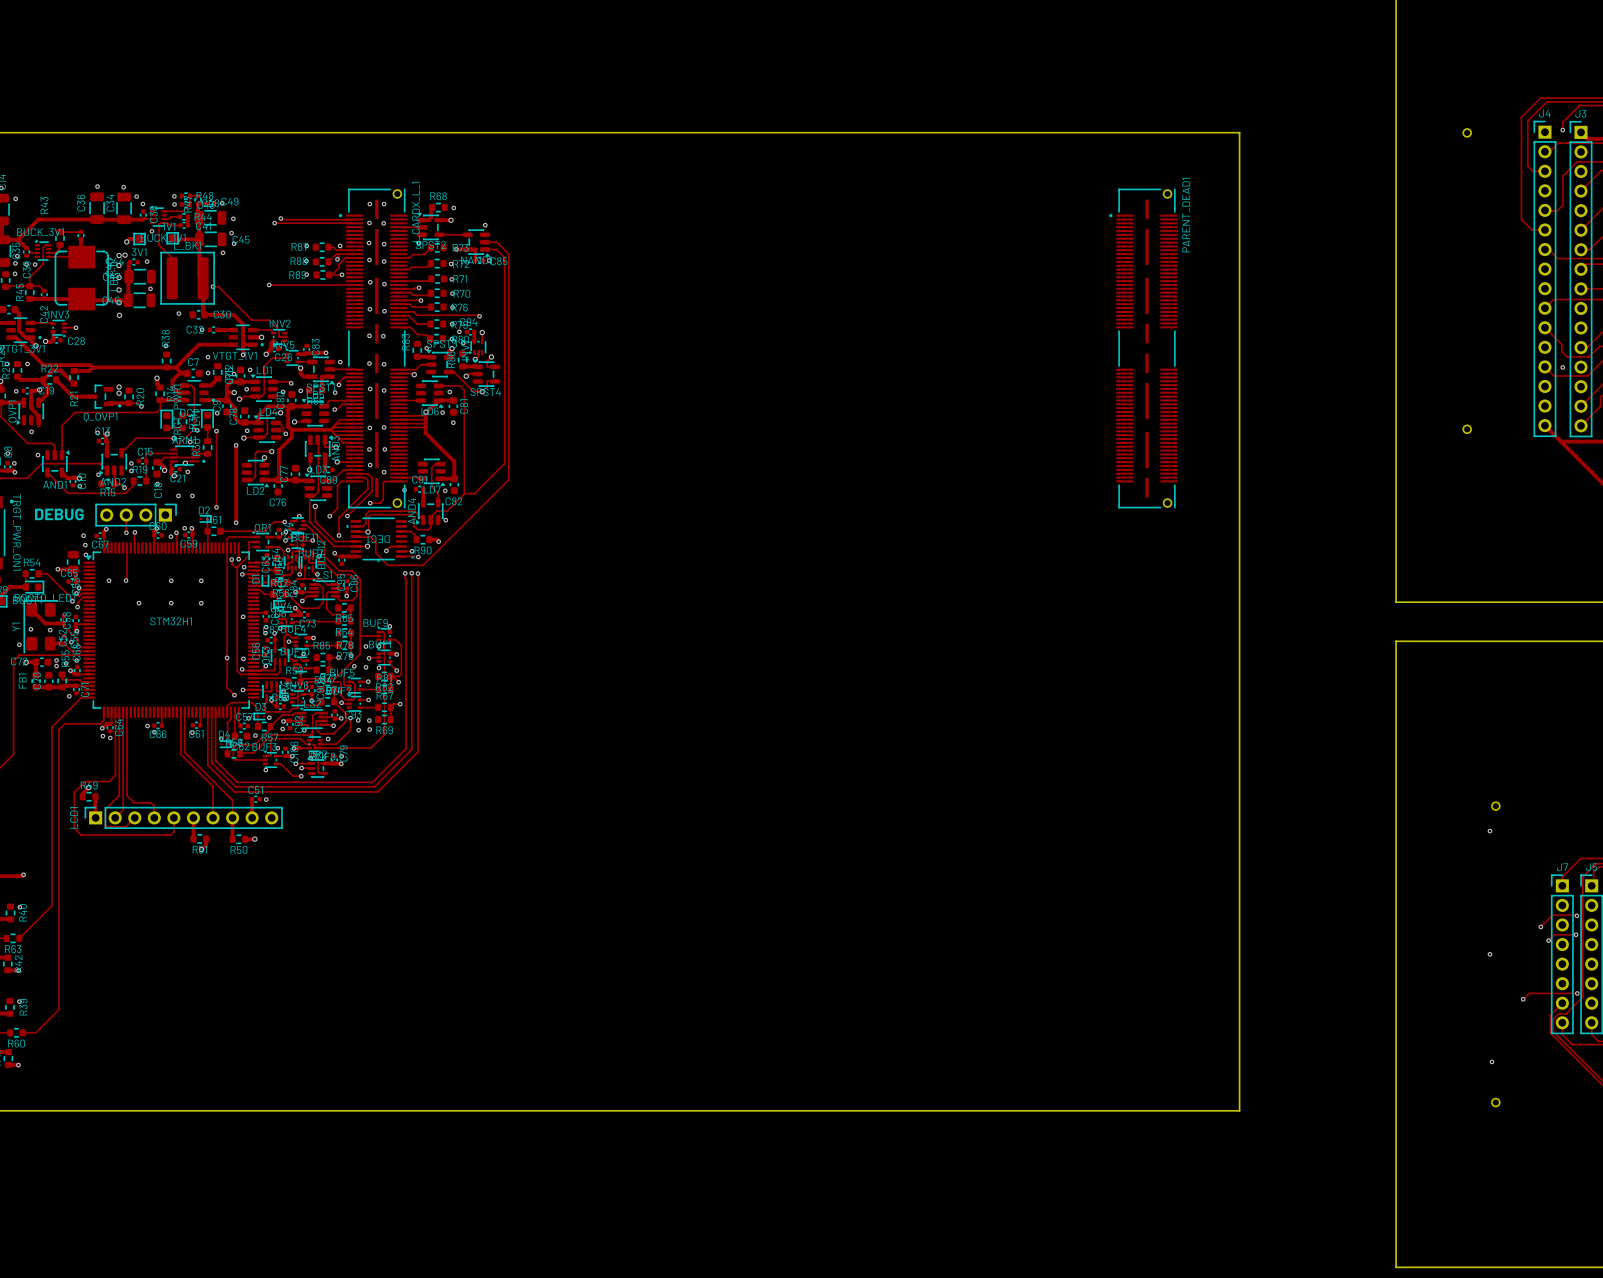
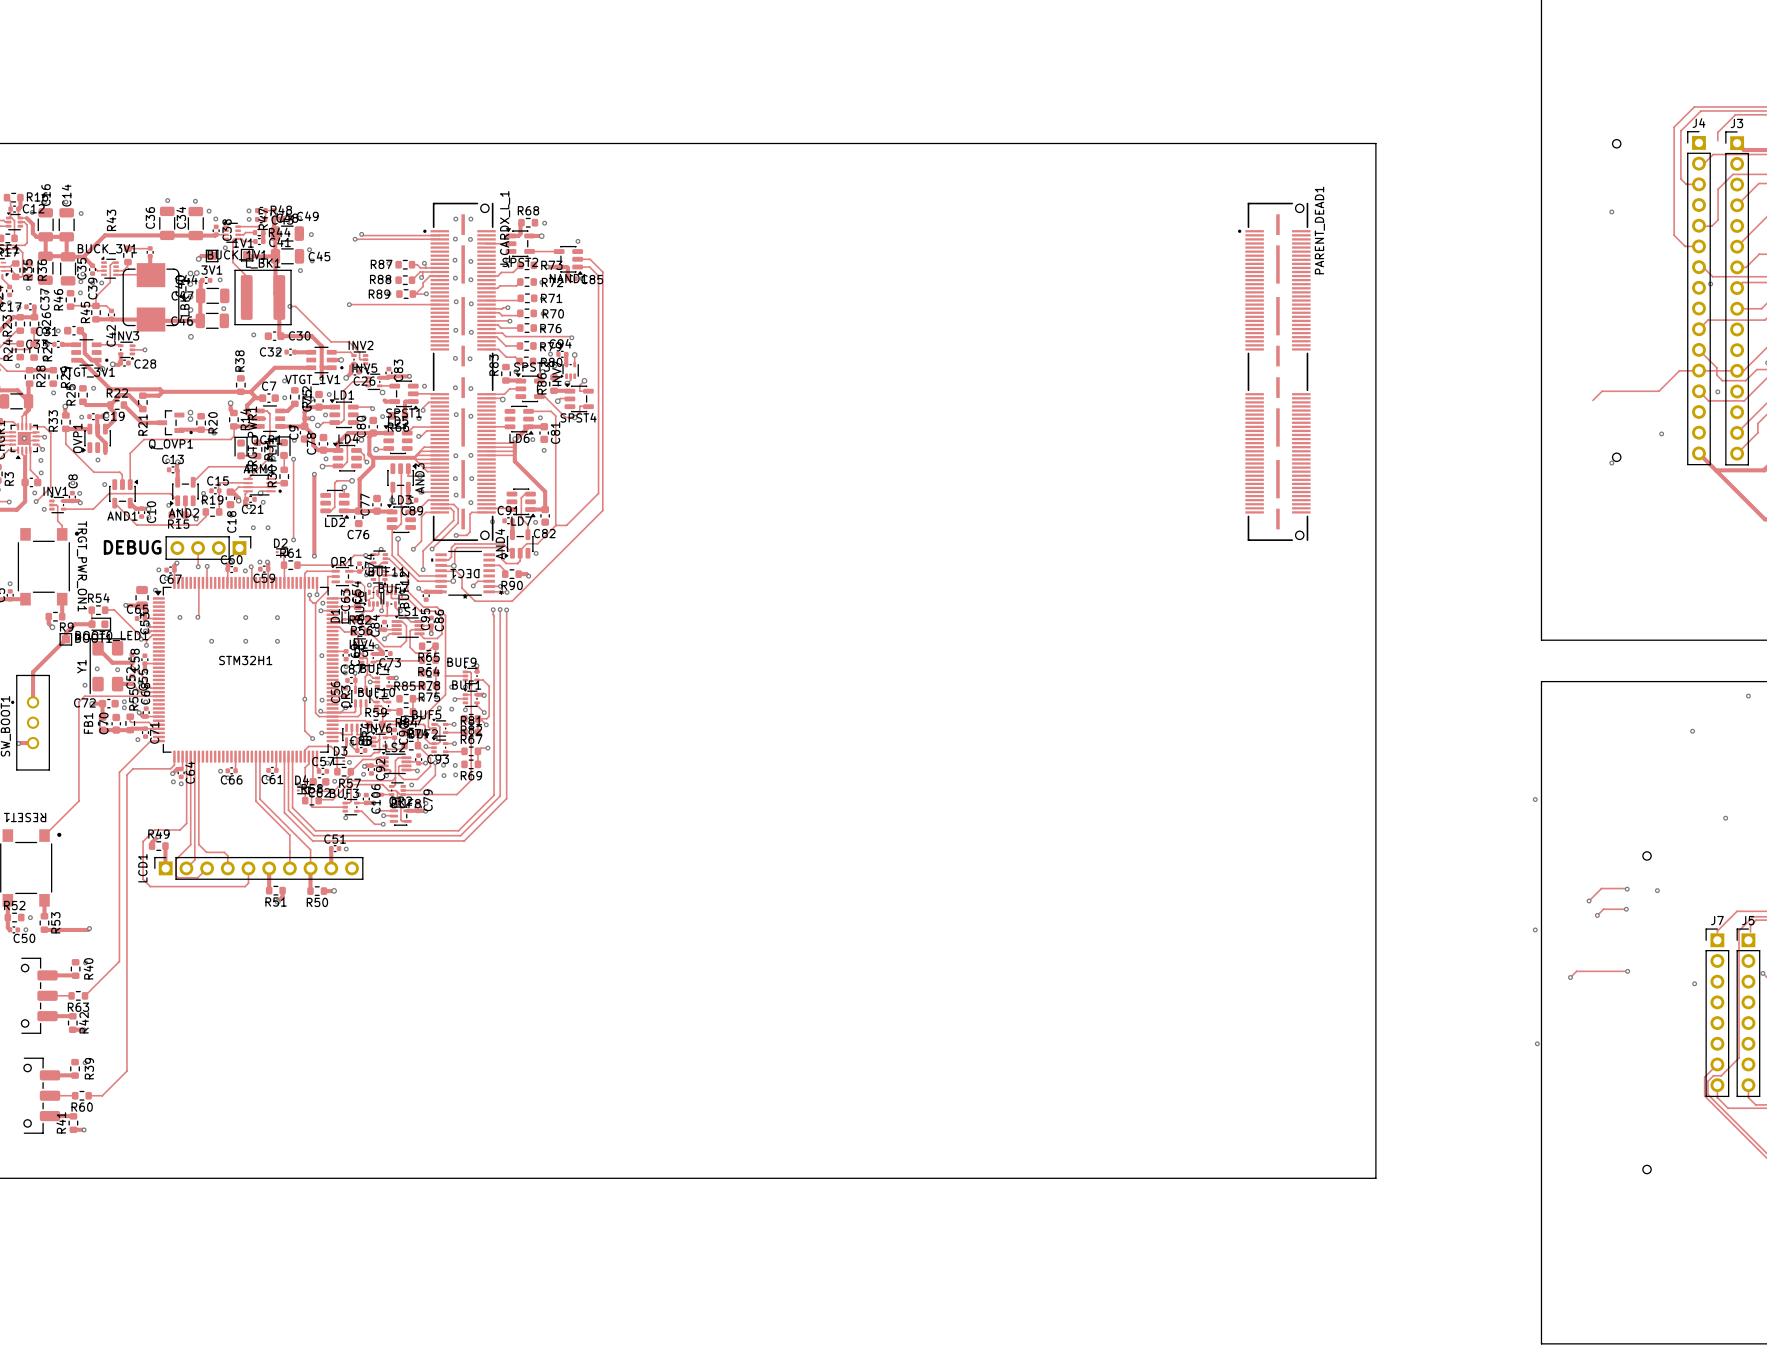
via: (1562, 130) -> none
via: none -> (1611, 211)
via: none -> (1710, 283)
track: none -> (1737, 370) (1679, 370) (1658, 391) (1602, 391) (1592, 400)
track: (300, 368) (302, 375) -> none
via: none -> (1661, 433)
via: none -> (1611, 463)
via: (83, 535) -> none
via: none -> (158, 569)
via: none -> (166, 578)
via: (85, 545) -> none
via: none -> (1748, 696)
via: none -> (1692, 731)
via: none -> (1535, 799)
via: none -> (1725, 818)
via: (1489, 831) -> none
via: none -> (1627, 889)
via: none -> (1657, 890)
via: none -> (1589, 900)
via: none -> (1626, 909)
via: none -> (1597, 915)
via: none -> (1535, 929)
via: none -> (1627, 971)
track: (1576, 915) (1552, 915) (1540, 926) -> (1627, 889) (1601, 888) (1589, 900)
via: (1576, 915) -> none
via: none -> (1570, 977)
track: (1576, 934) (1554, 934) (1548, 940) -> (1626, 909) (1603, 909) (1597, 915)
via: (1576, 934) -> none
via: (1548, 940) -> none
via: (1489, 954) -> none
via: none -> (1537, 1043)
track: (1577, 993) (1529, 993) (1523, 999) -> (1627, 971) (1576, 971) (1570, 977)
via: (1577, 993) -> none
via: (1523, 999) -> none
via: (1491, 1061) -> none

